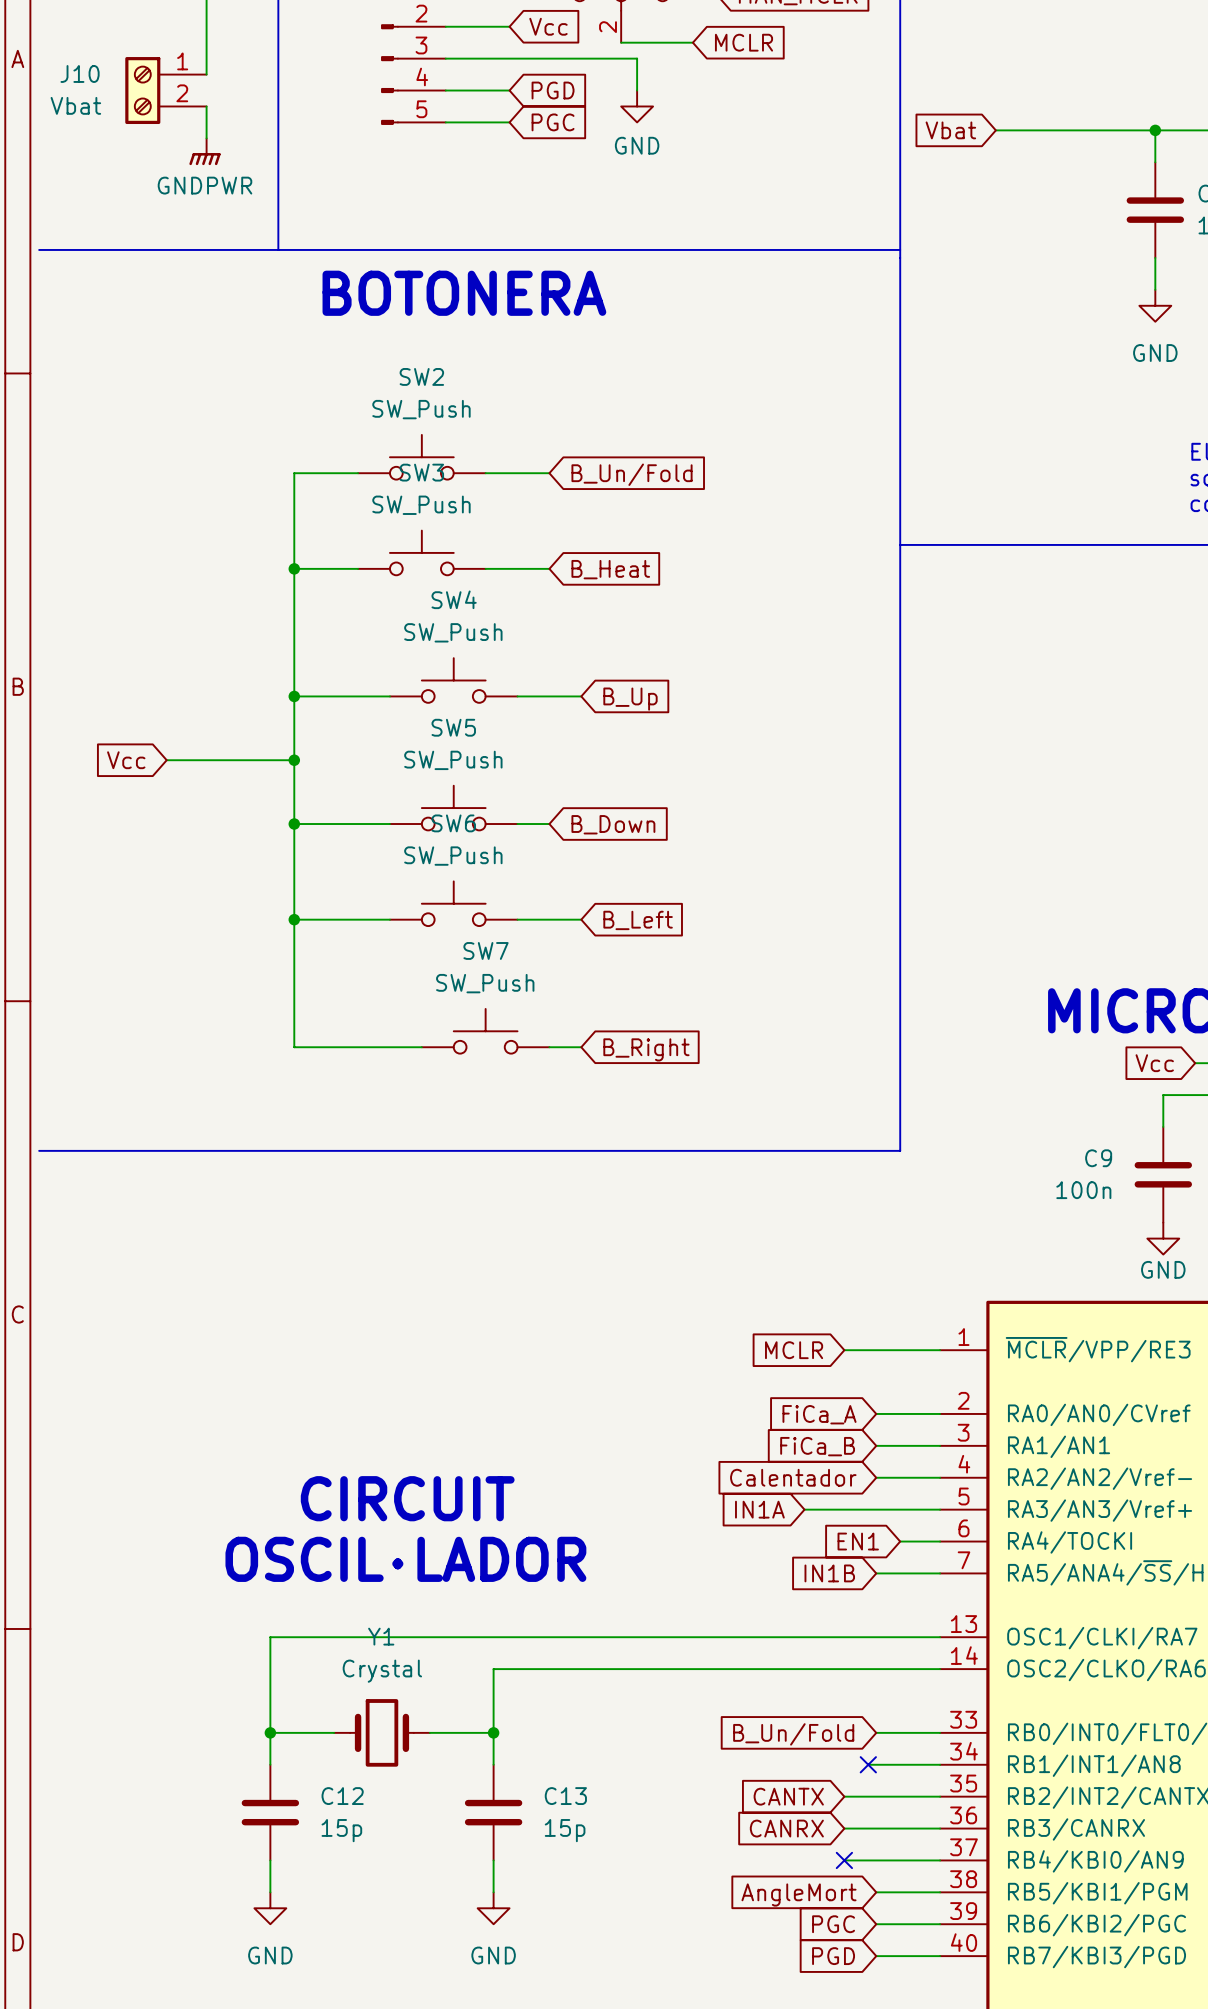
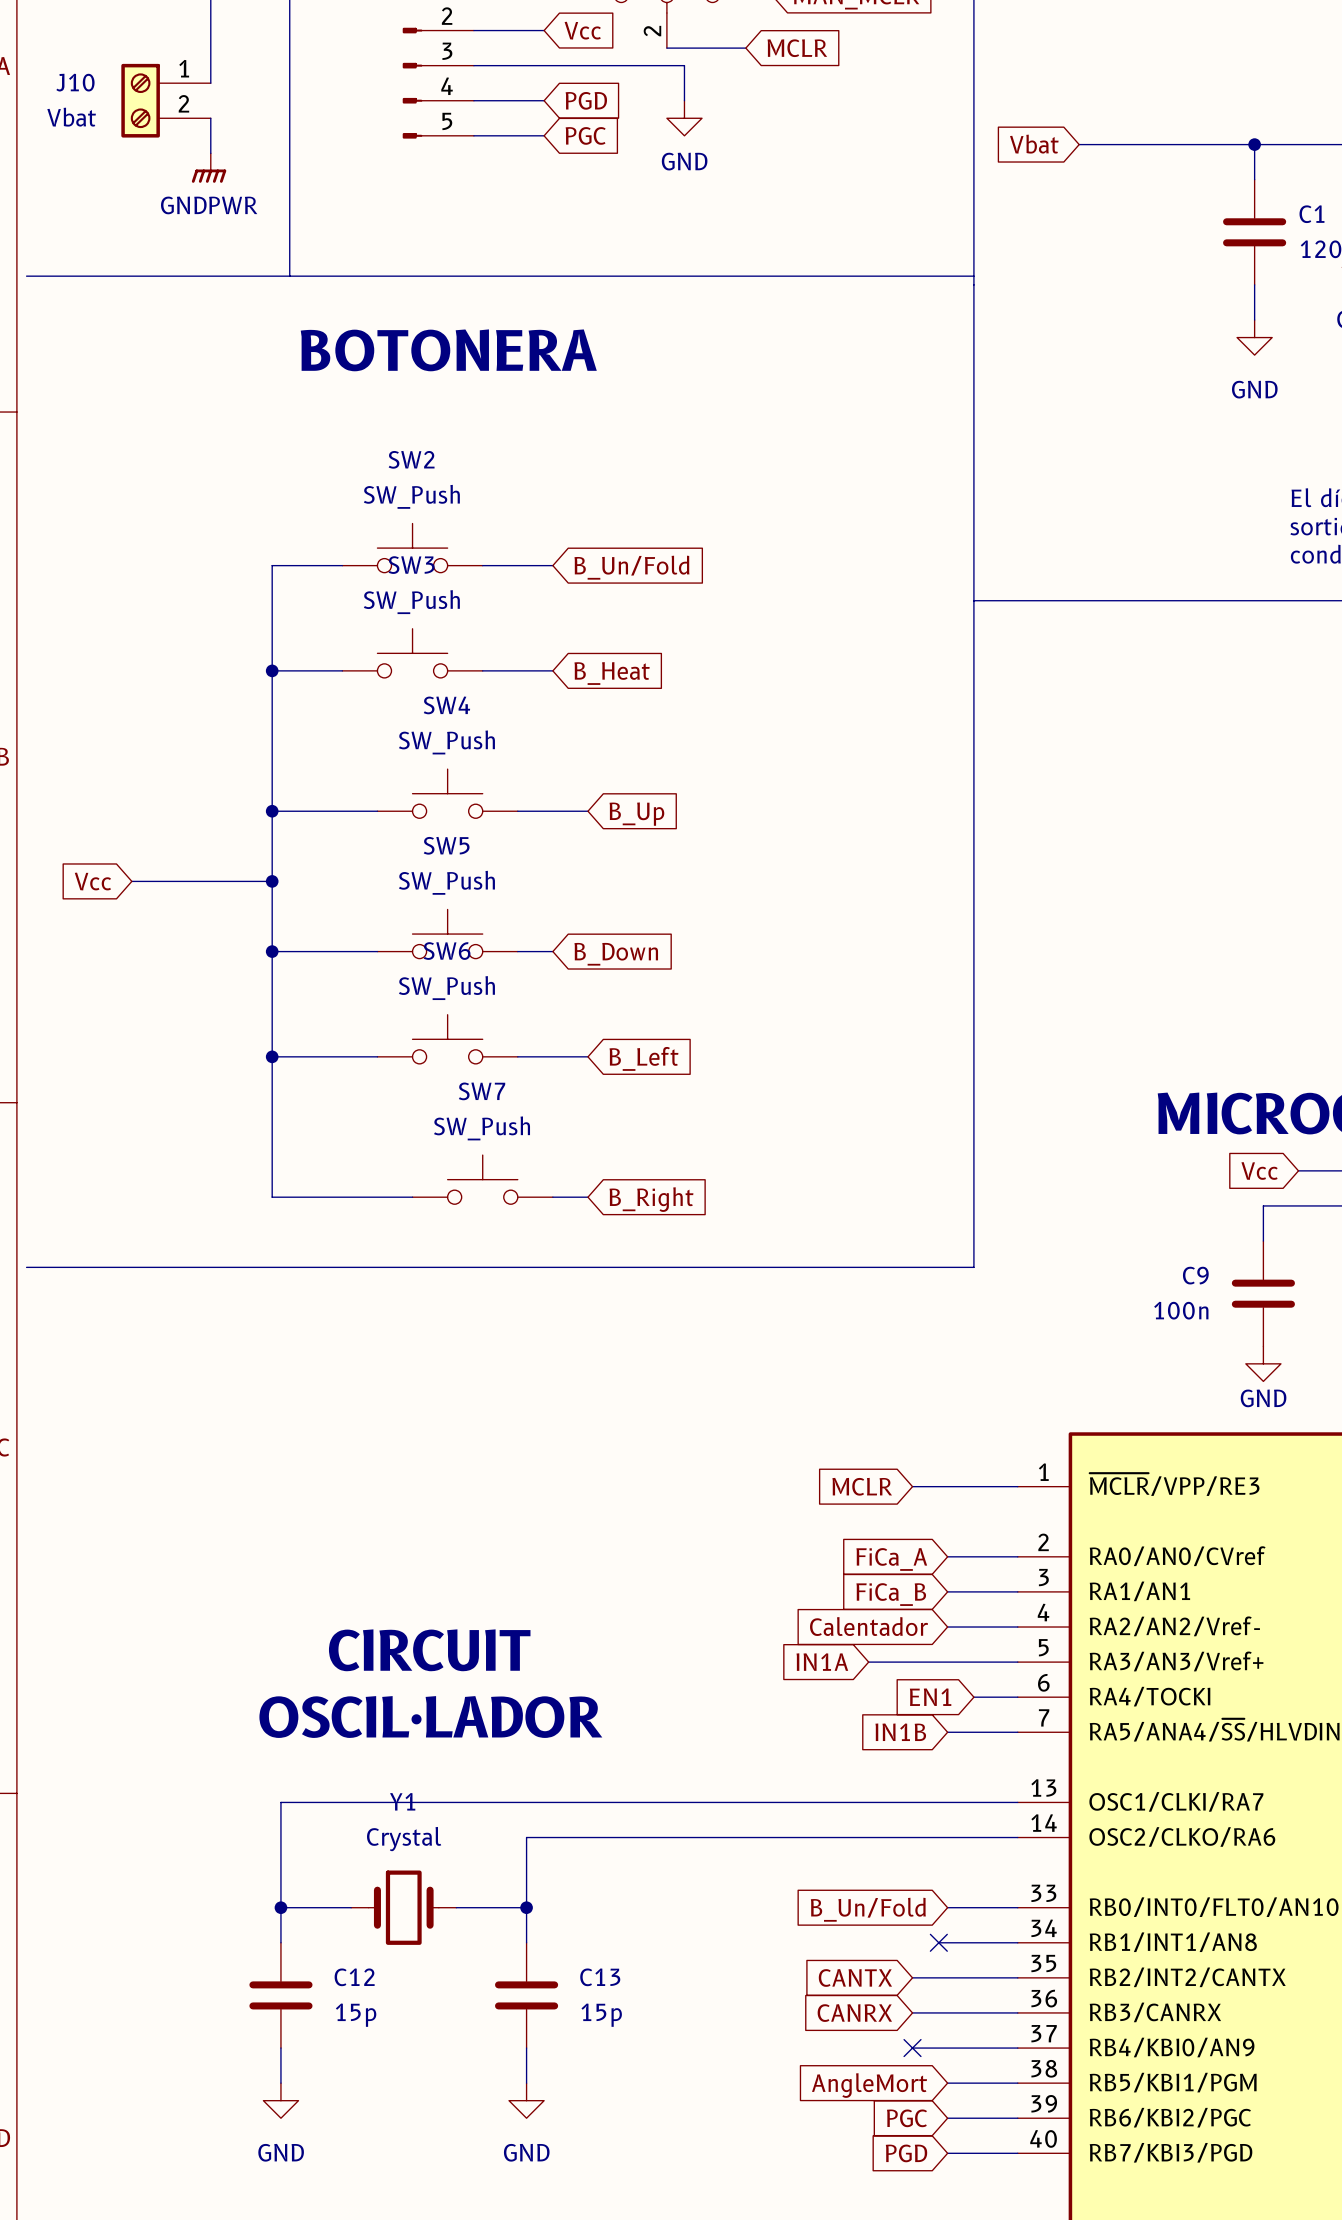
text position: BOTONERA (464, 293) -> BOTONERA (448, 350)
SW2 position: (421, 457) -> (412, 548)
wire: (358, 473) (294, 473) (294, 1047) (421, 1047) -> (342, 565) (272, 565) (272, 1197) (412, 1197)
wire: (485, 473) (549, 473) -> (482, 565) (552, 565)
global label position: B_Un/Fold (632, 474) -> B_Un/Fold (631, 567)
SW3 position: (421, 552) -> (412, 653)
wire: (294, 568) (358, 568) -> (272, 670) (342, 670)
junction: (294, 568) -> none
wire: (485, 568) (549, 568) -> (482, 670) (552, 670)
global label position: B_Heat (610, 569) -> B_Heat (612, 673)
junction: none -> (272, 670)
SW4 position: (453, 680) -> (447, 793)
wire: (294, 696) (389, 696) -> (272, 811) (377, 811)
junction: (294, 696) -> none
wire: (517, 696) (581, 696) -> (517, 811) (587, 811)
global label position: B_Up (630, 699) -> B_Up (636, 814)
junction: none -> (272, 811)
global label position: Vcc (126, 760) -> Vcc (92, 881)
wire: (166, 760) (294, 760) -> (131, 881) (272, 881)
junction: (294, 760) -> none
junction: none -> (272, 881)
SW5 position: (453, 808) -> (447, 934)
wire: (294, 824) (389, 824) -> (272, 951) (377, 951)
junction: (294, 824) -> none
wire: (517, 824) (549, 824) -> (517, 951) (552, 951)
global label position: B_Down (613, 824) -> B_Down (616, 954)
junction: none -> (272, 951)
SW6 position: (453, 903) -> (447, 1039)
wire: (294, 919) (389, 919) -> (272, 1056) (377, 1056)
junction: (294, 919) -> none
wire: (517, 919) (581, 919) -> (517, 1056) (587, 1056)
global label position: B_Left (638, 920) -> B_Left (643, 1058)
junction: none -> (272, 1056)
SW7 position: (485, 1031) -> (482, 1179)
wire: (549, 1047) (581, 1047) -> (552, 1197) (587, 1197)
global label position: B_Right (646, 1049) -> B_Right (651, 1199)

